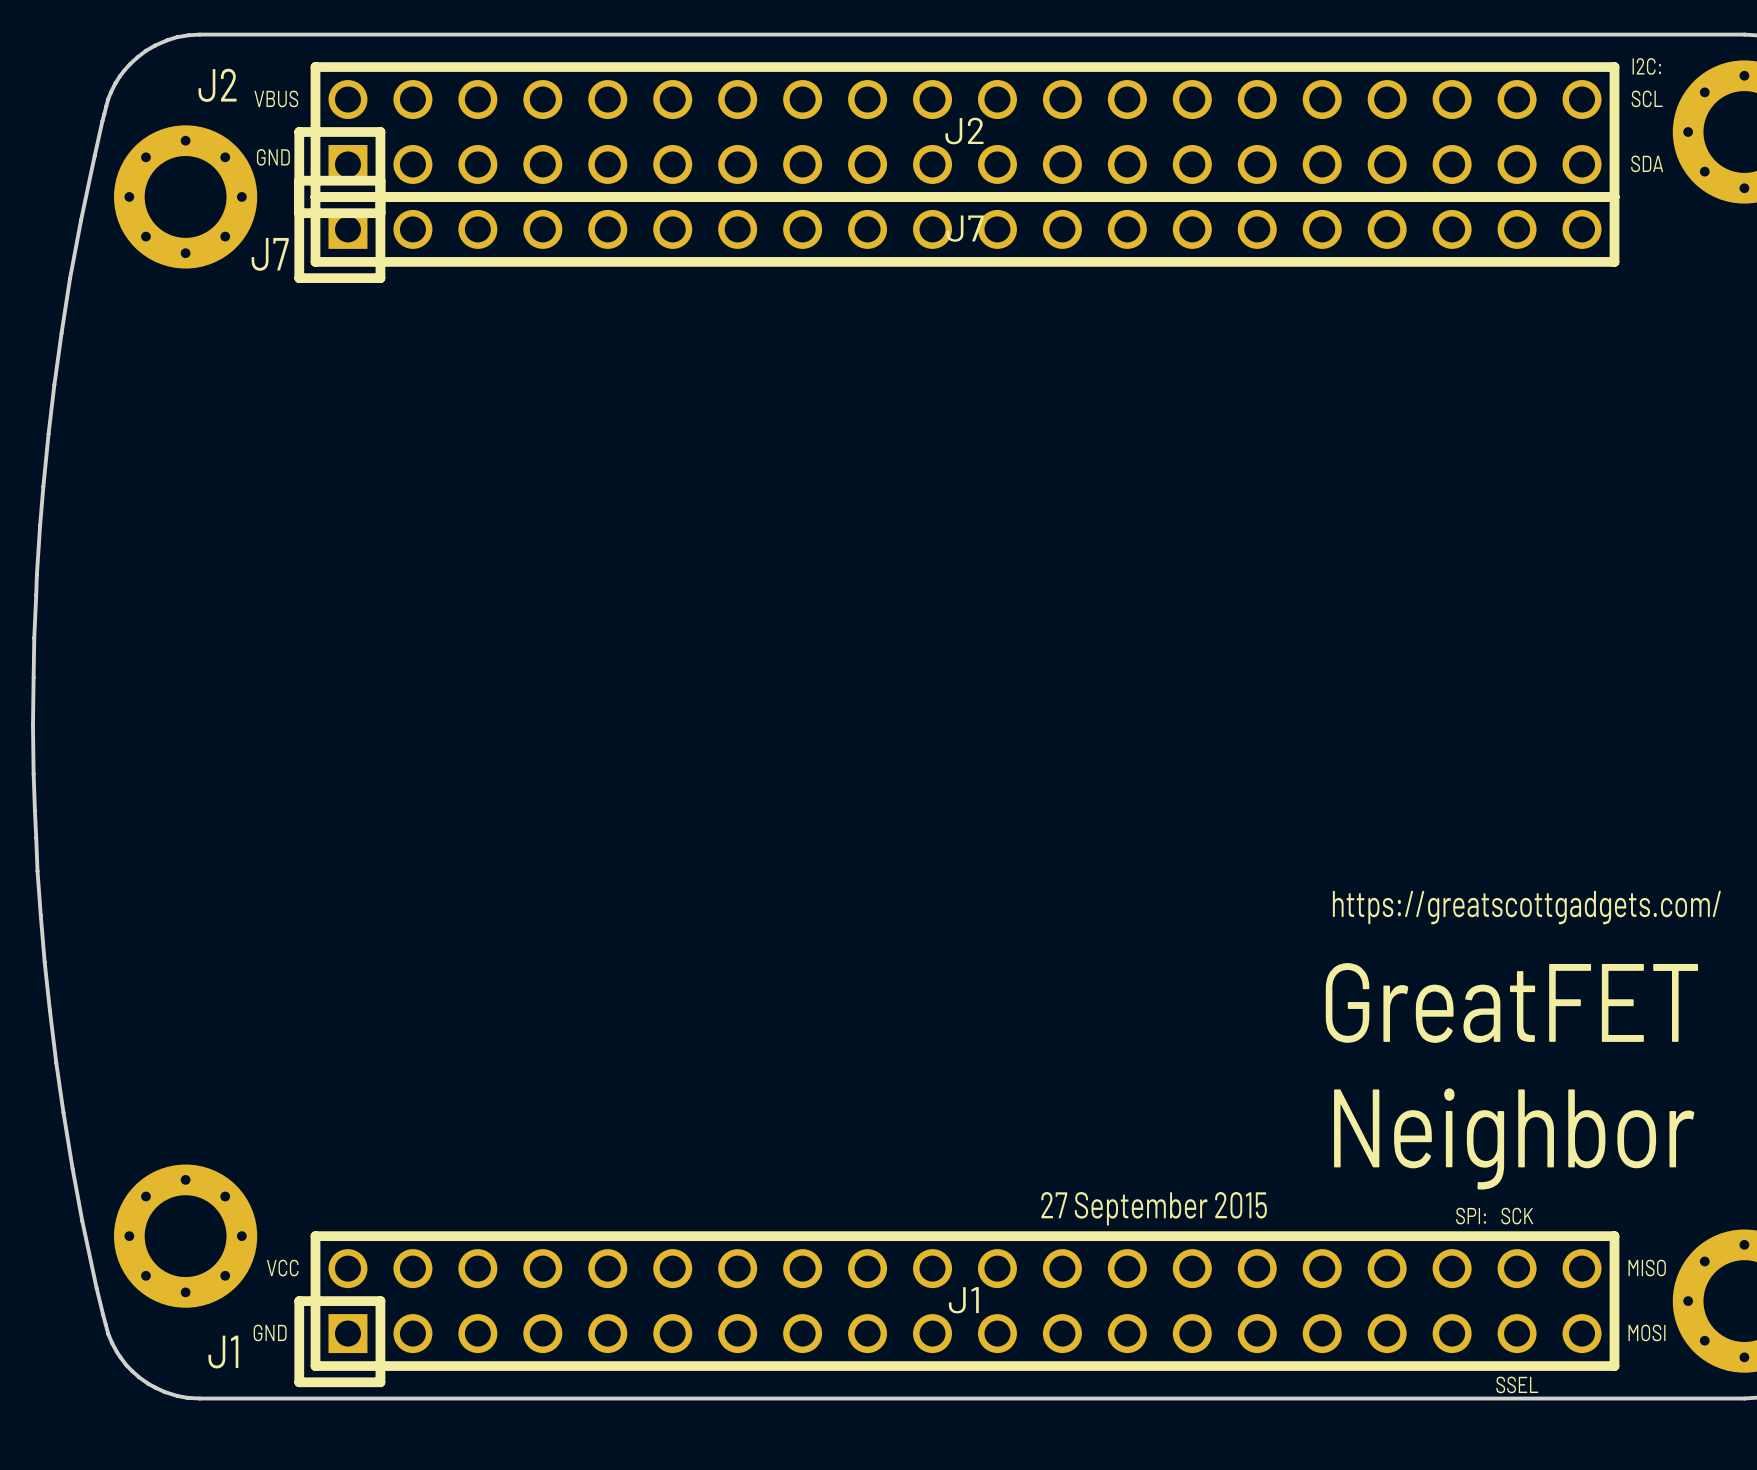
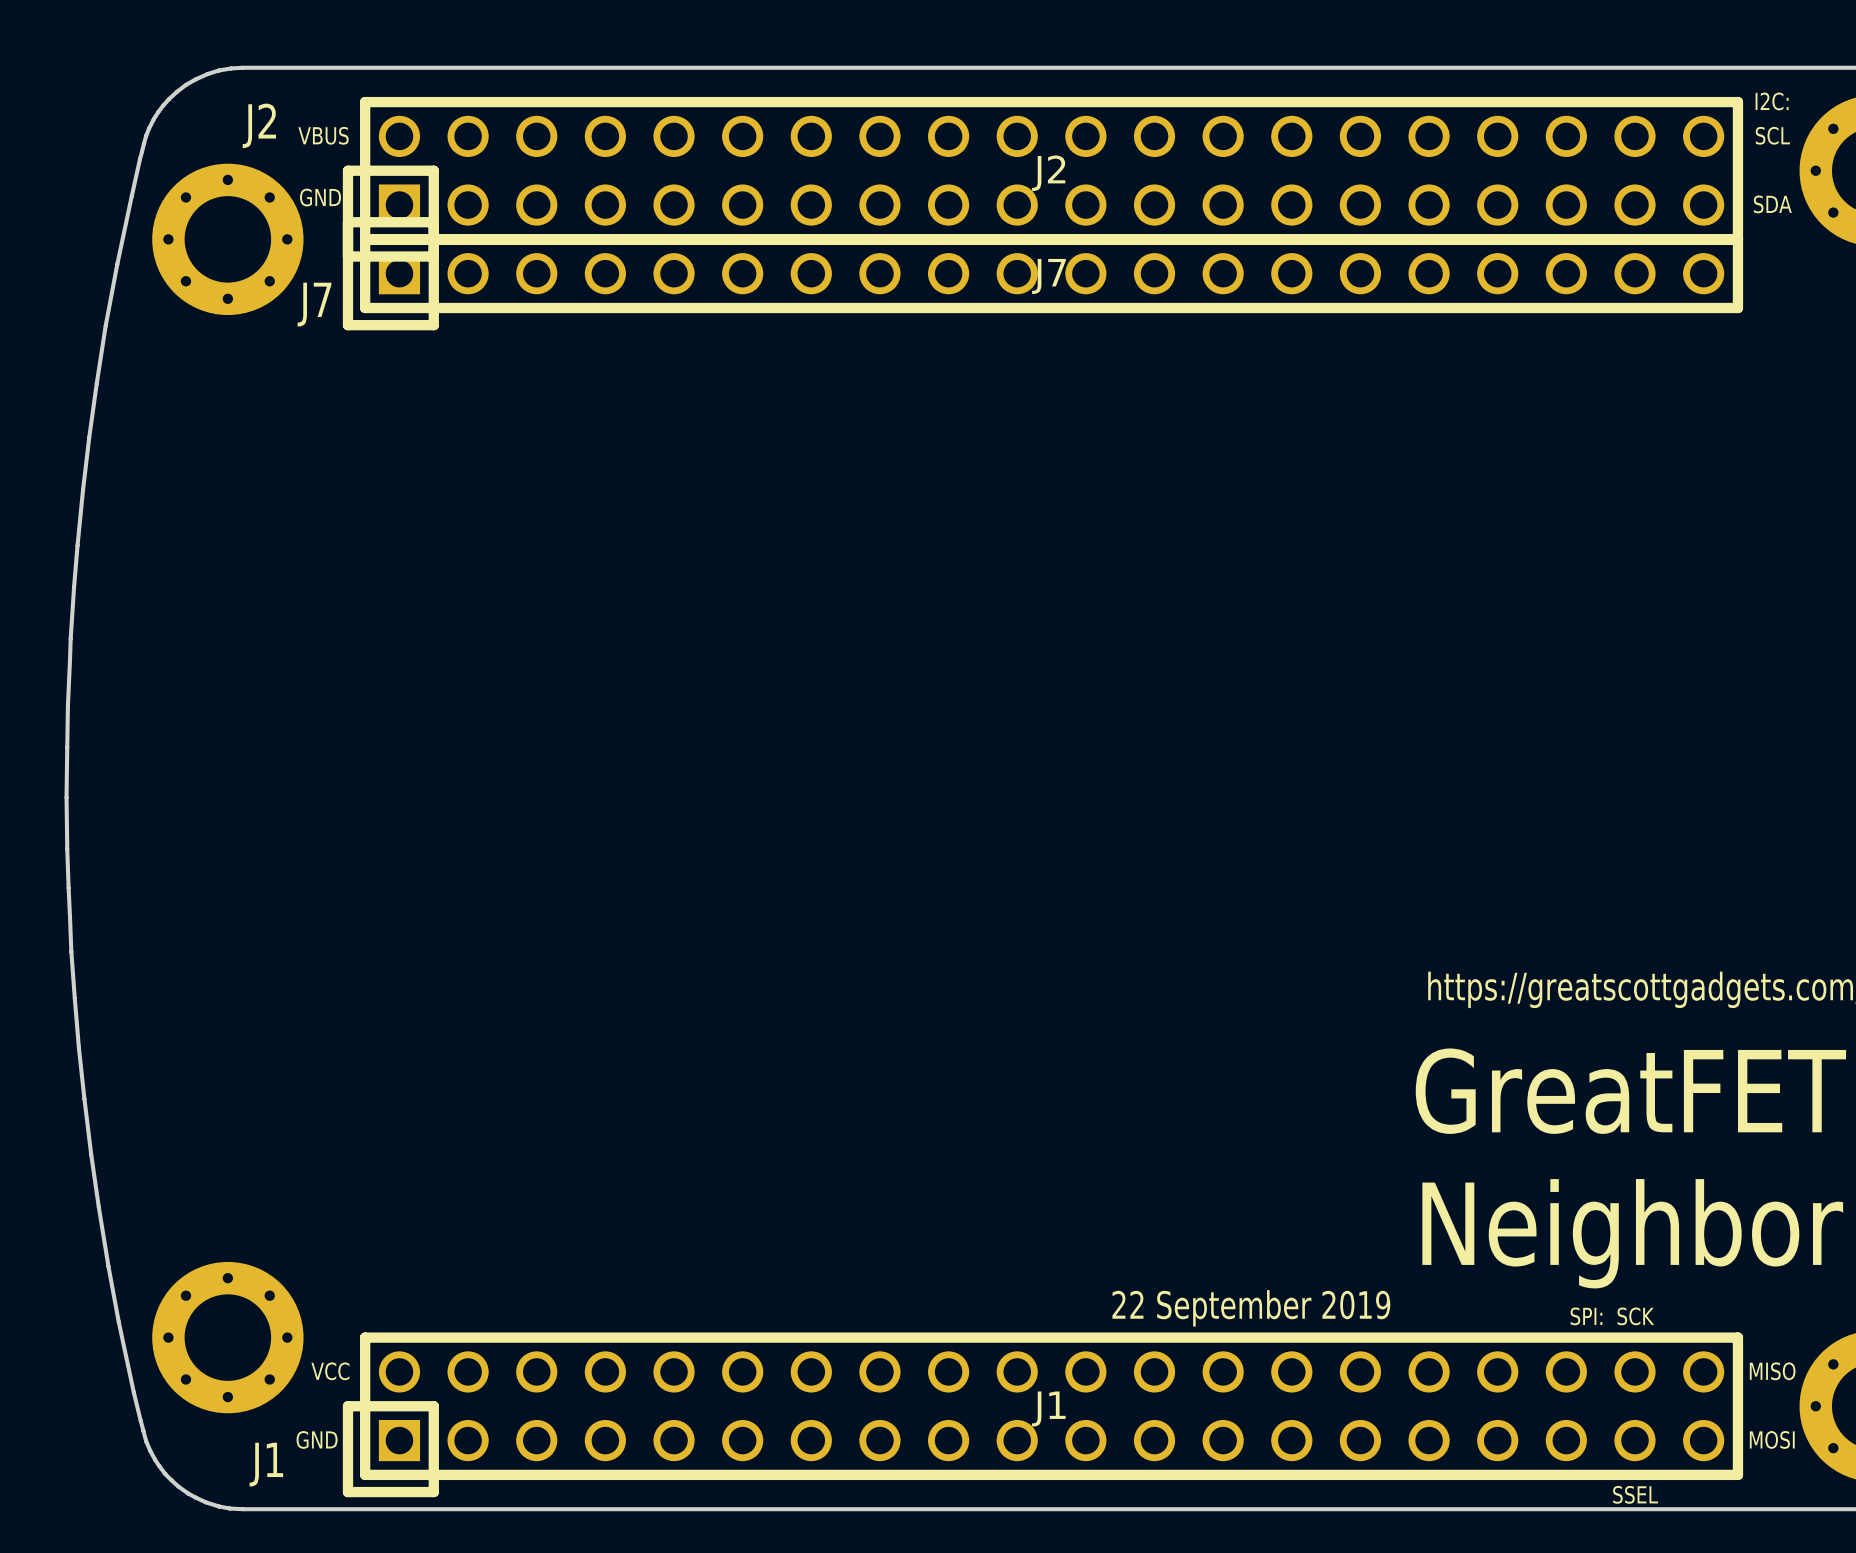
text: 27 September 2015 (1154, 1208) -> 22 September 2019 (1251, 1308)

